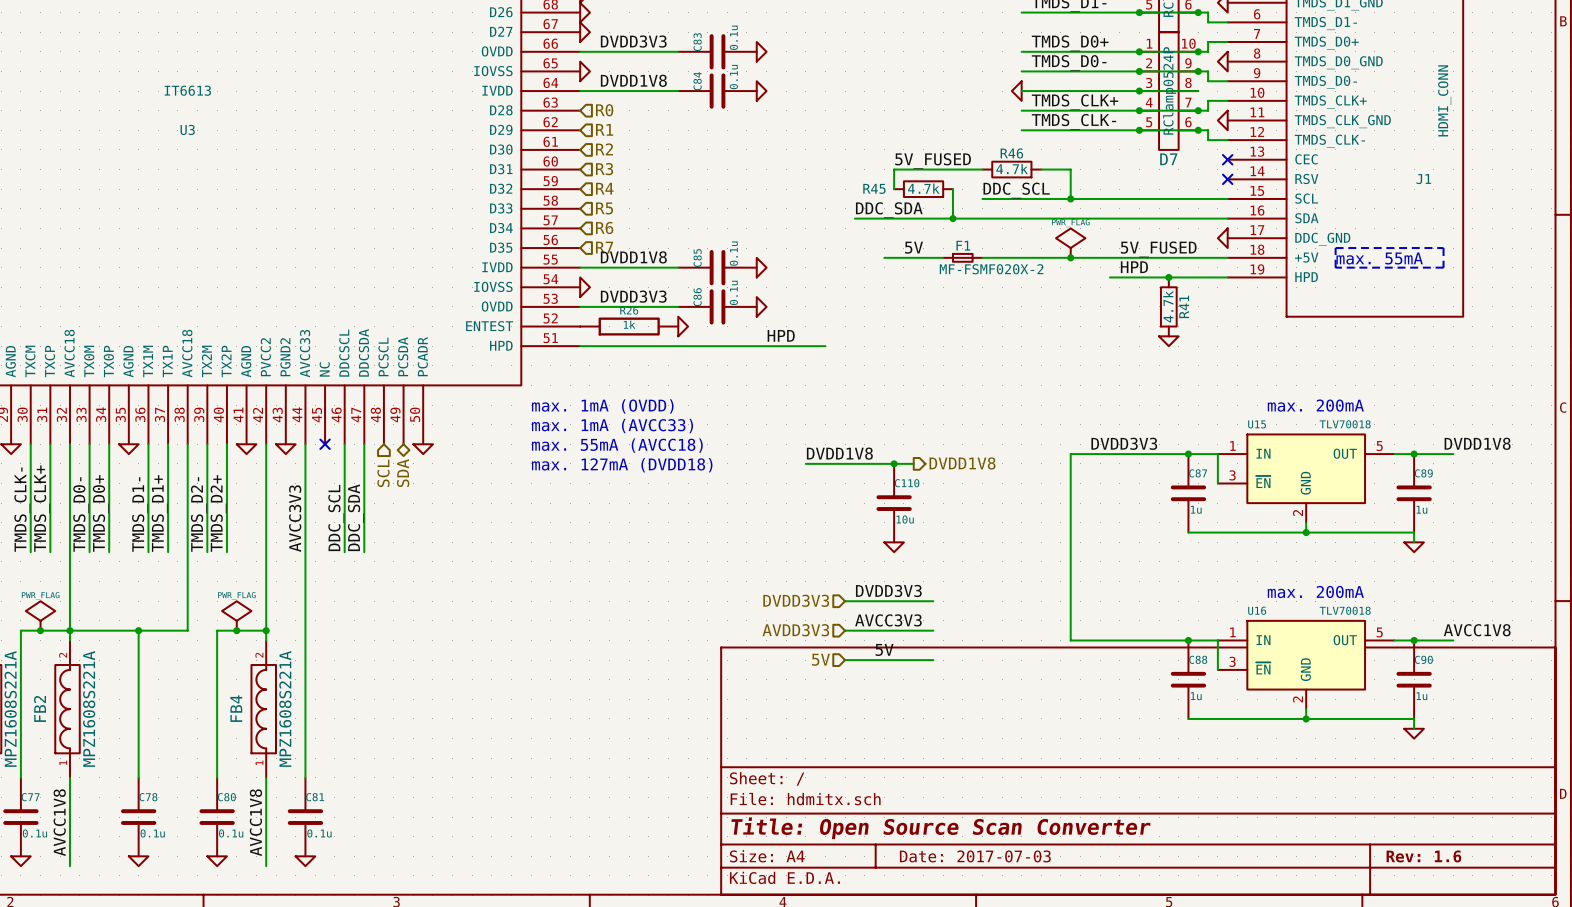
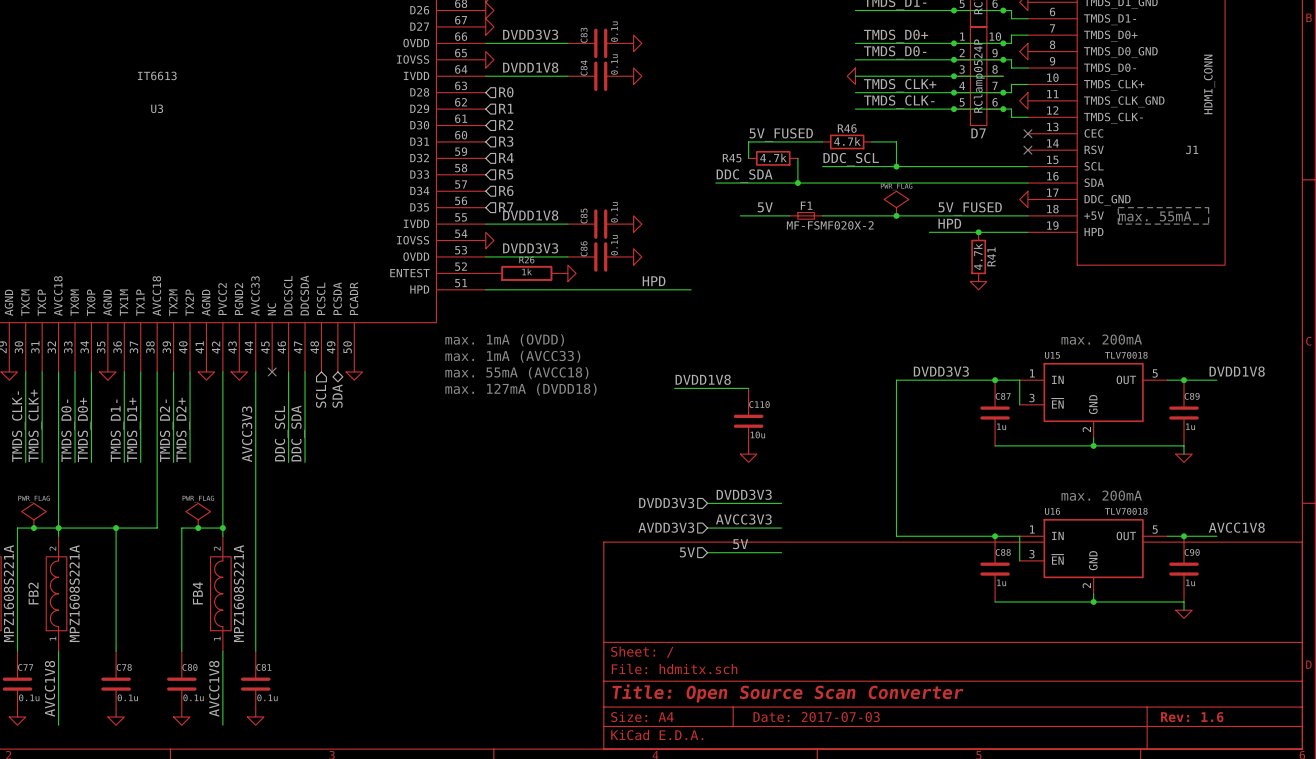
wire: (894, 463) (913, 463) -> none
junction: (894, 463) -> none
hierarchical label: DVDD1V8 (962, 463) -> none

